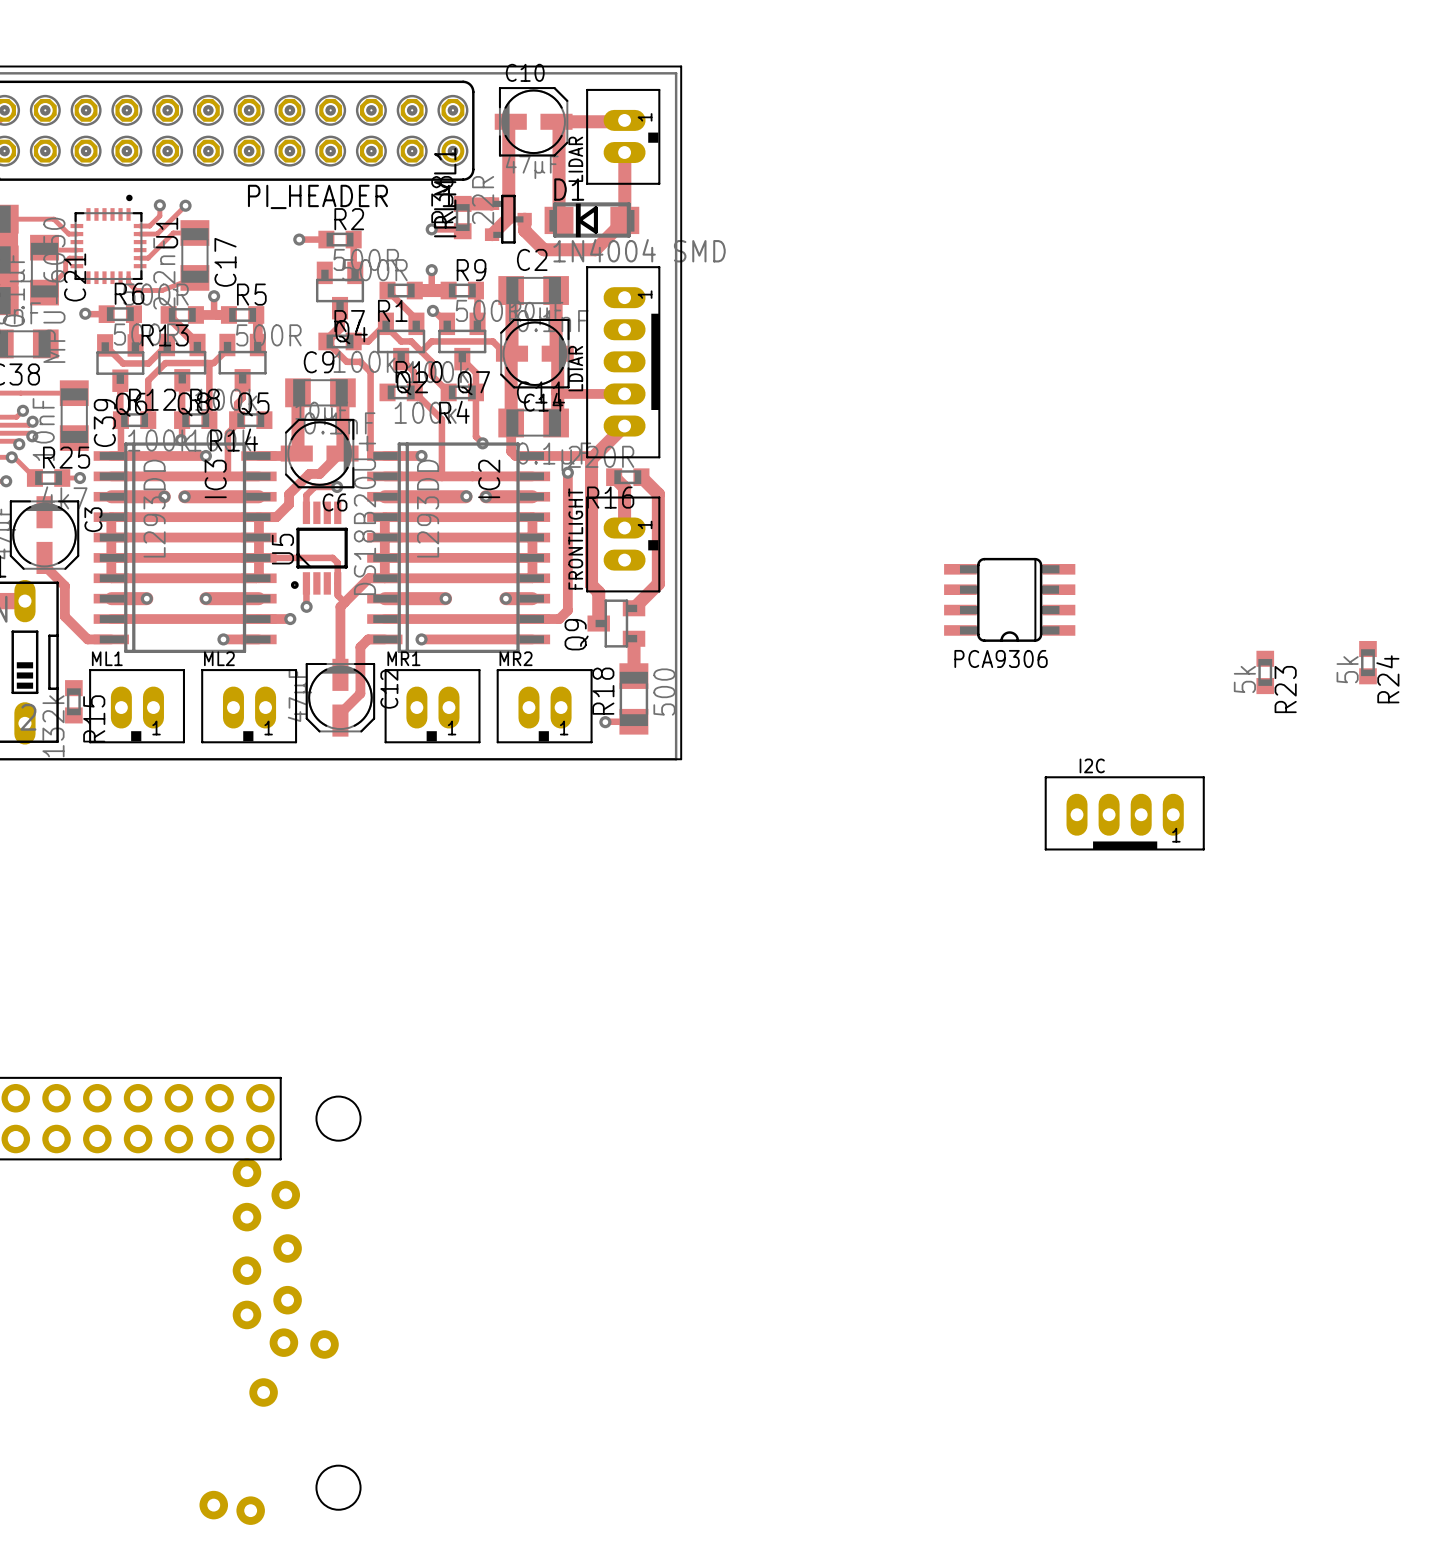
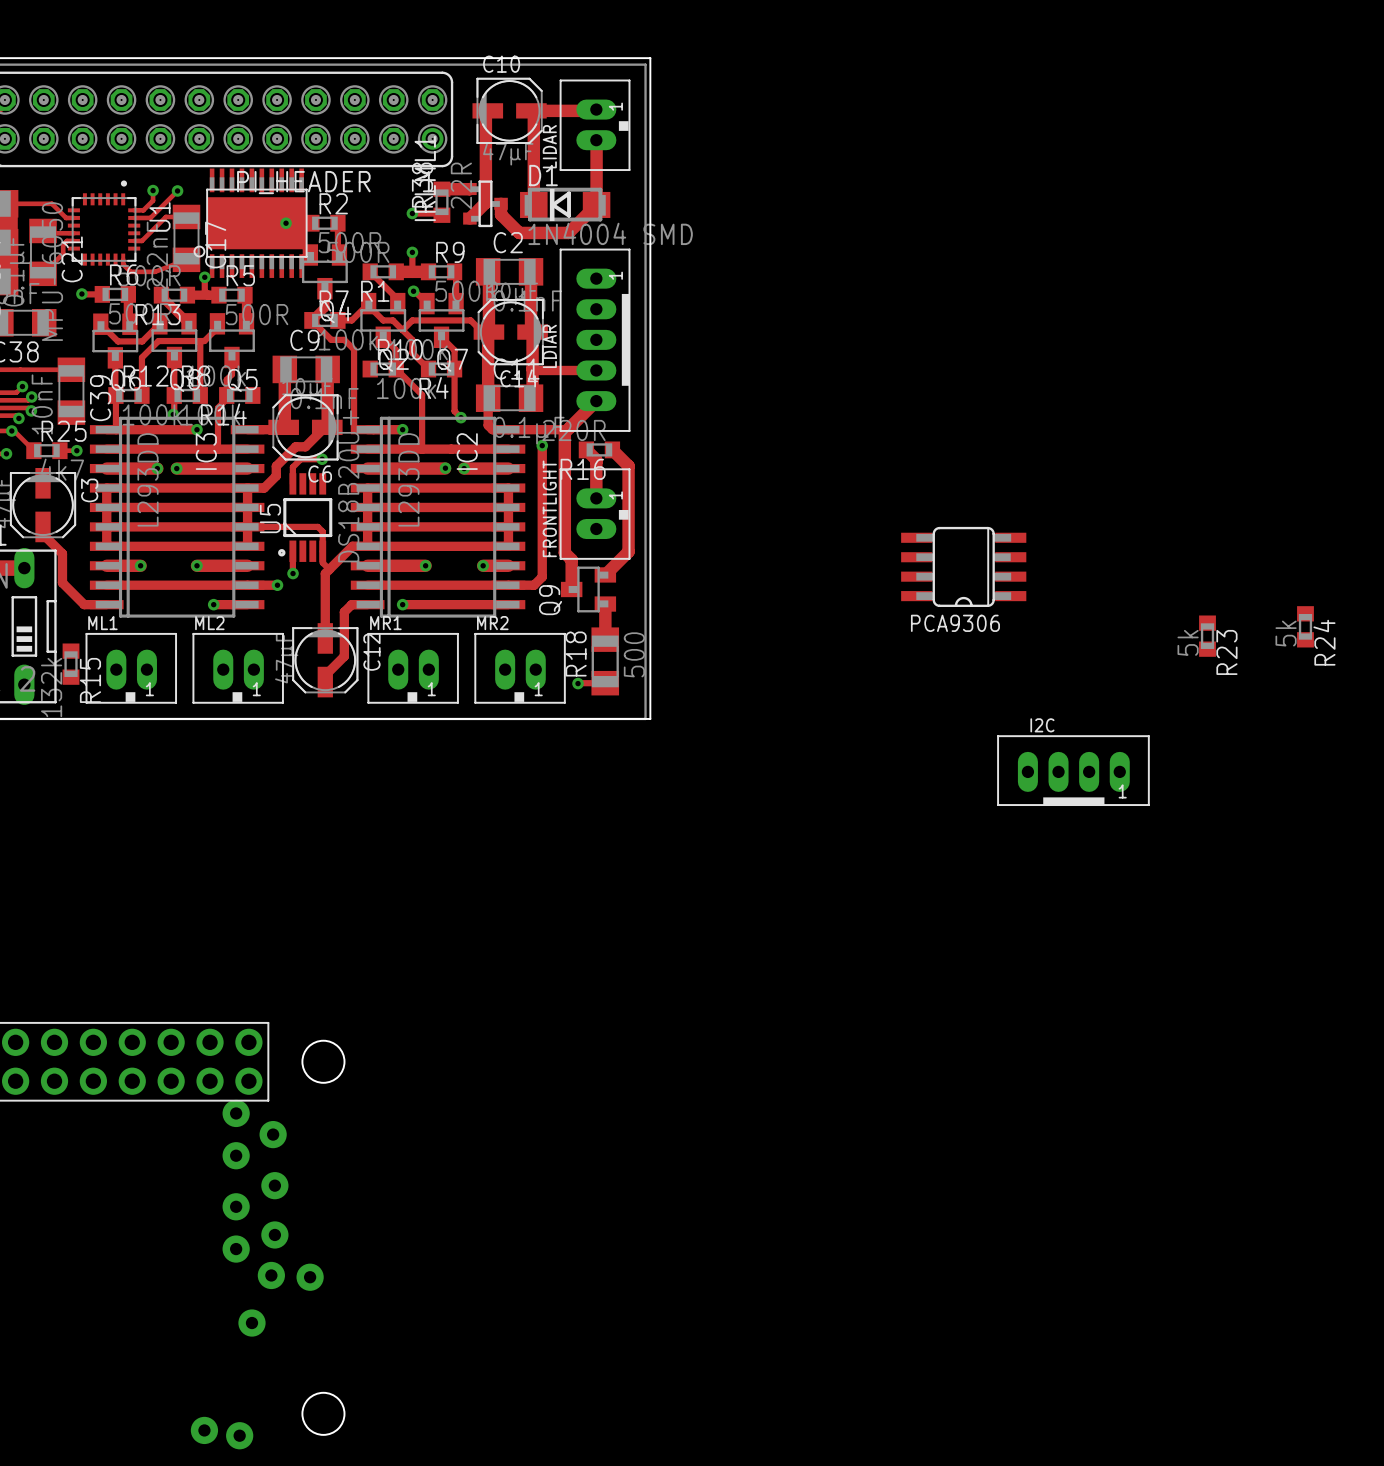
part: none -> (250, 223)

